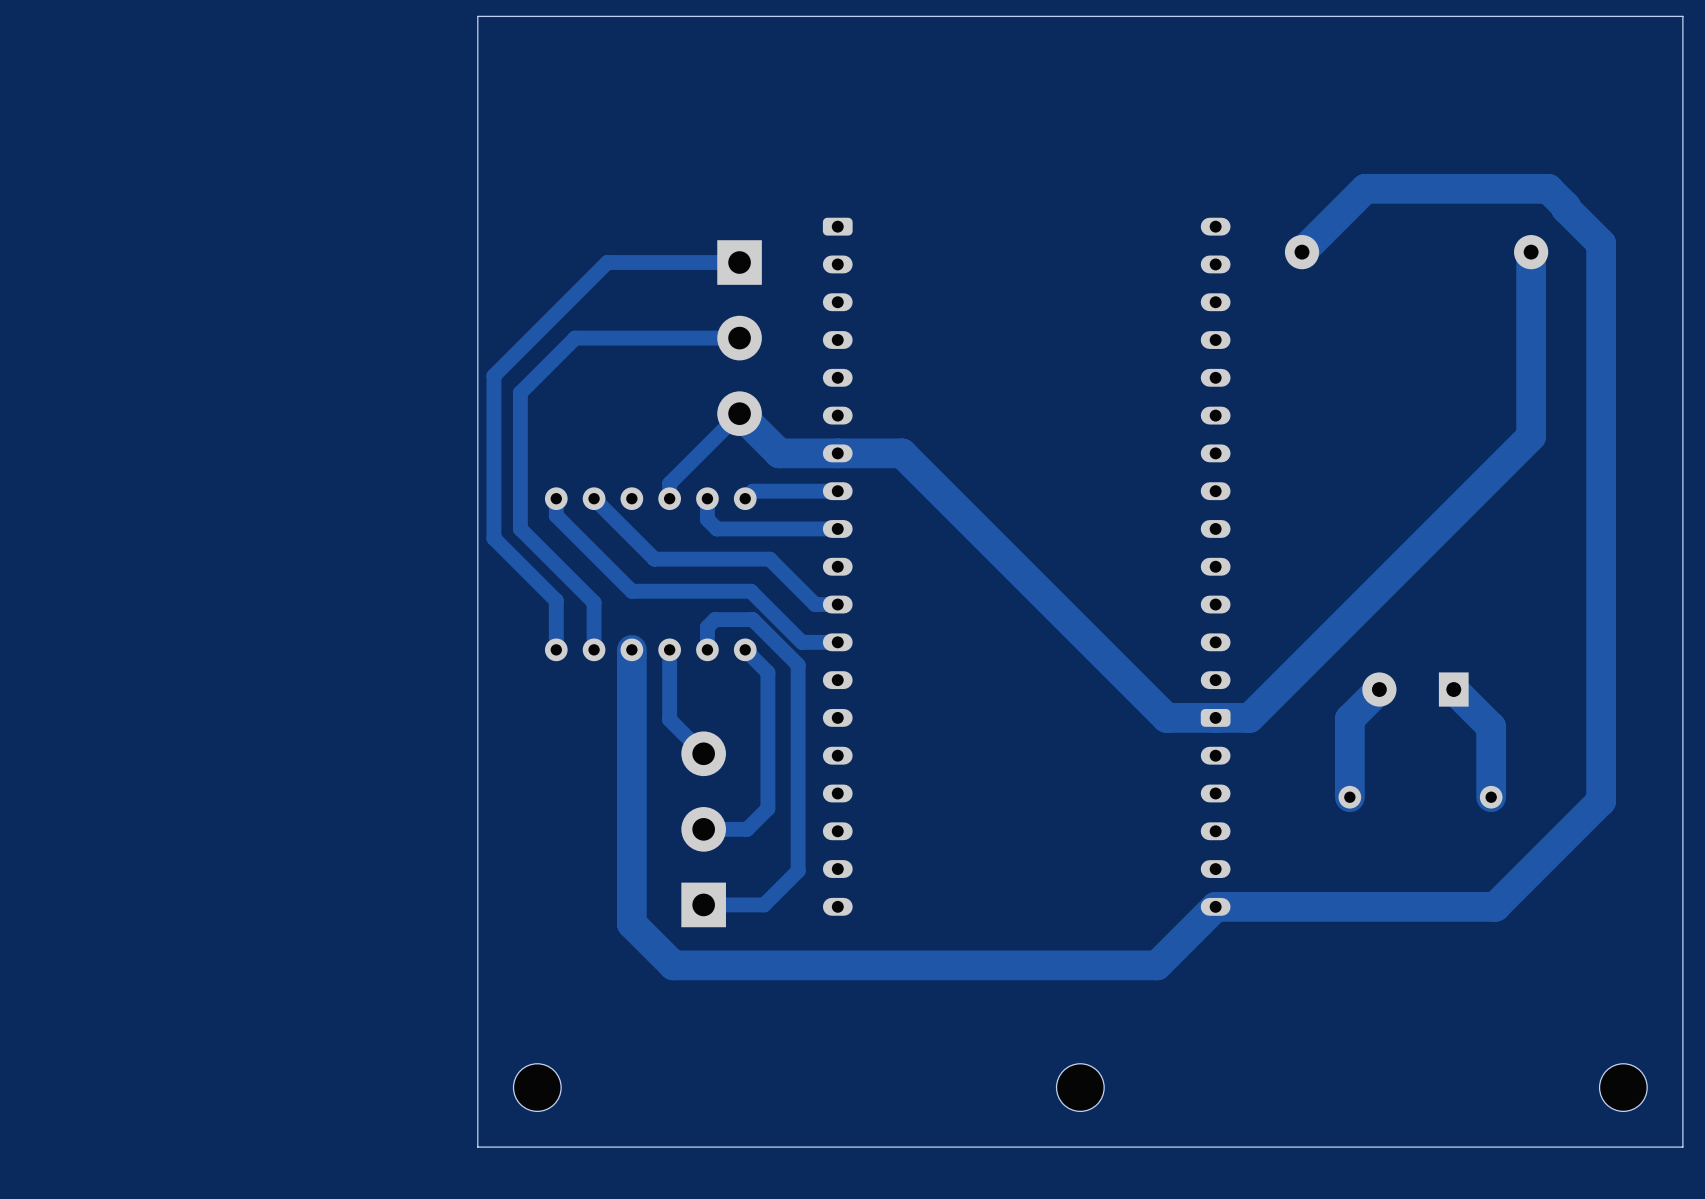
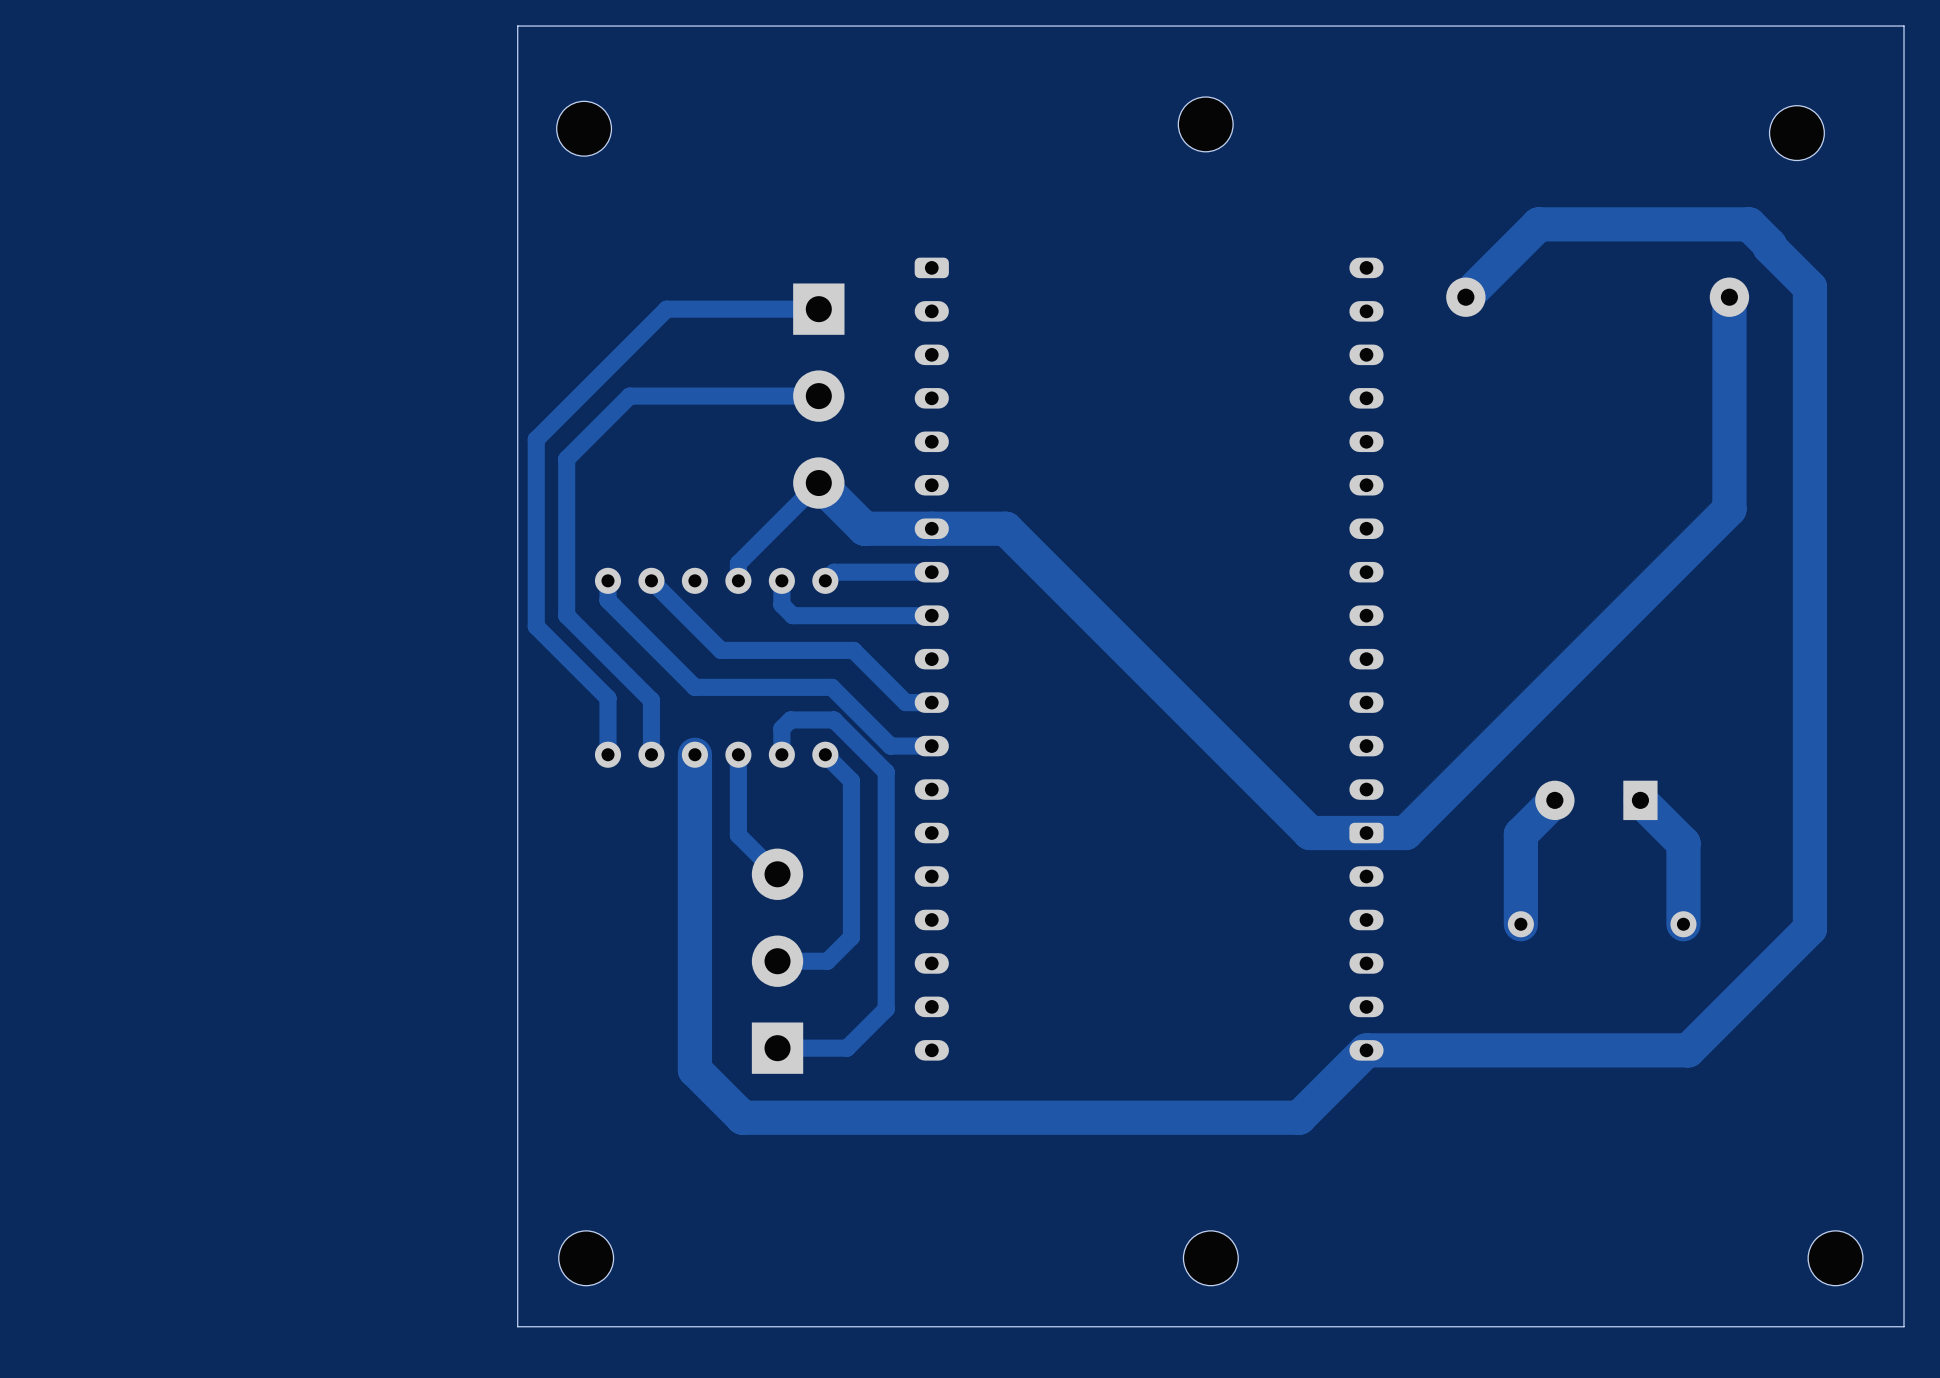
part: none -> (1205, 124)
part: none -> (584, 128)
part: none -> (1796, 133)

